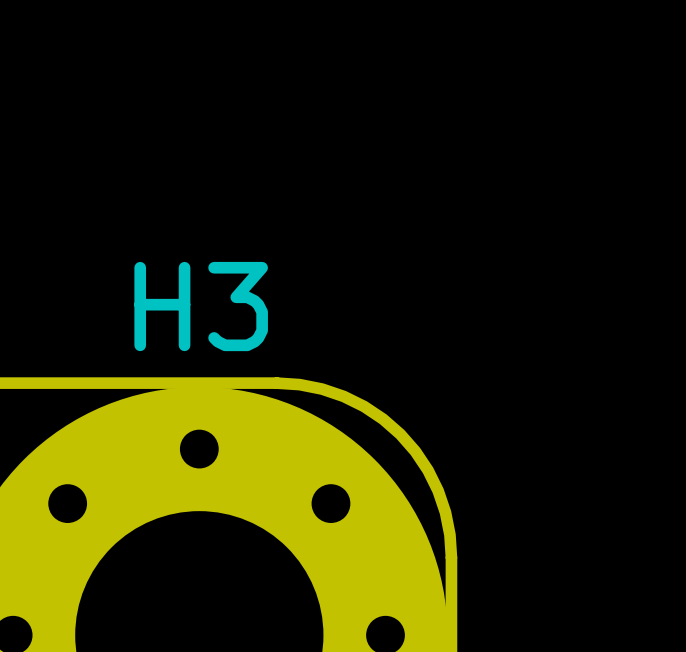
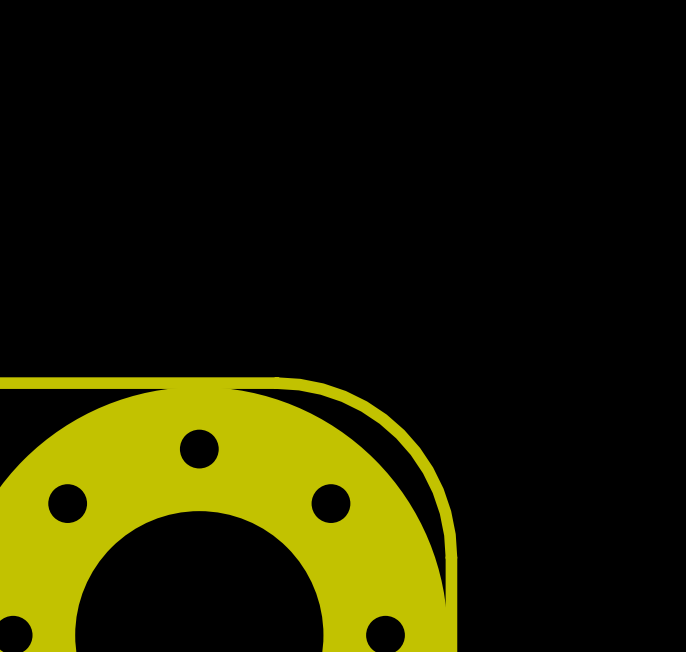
H3 name: H3 (201, 306) -> none

